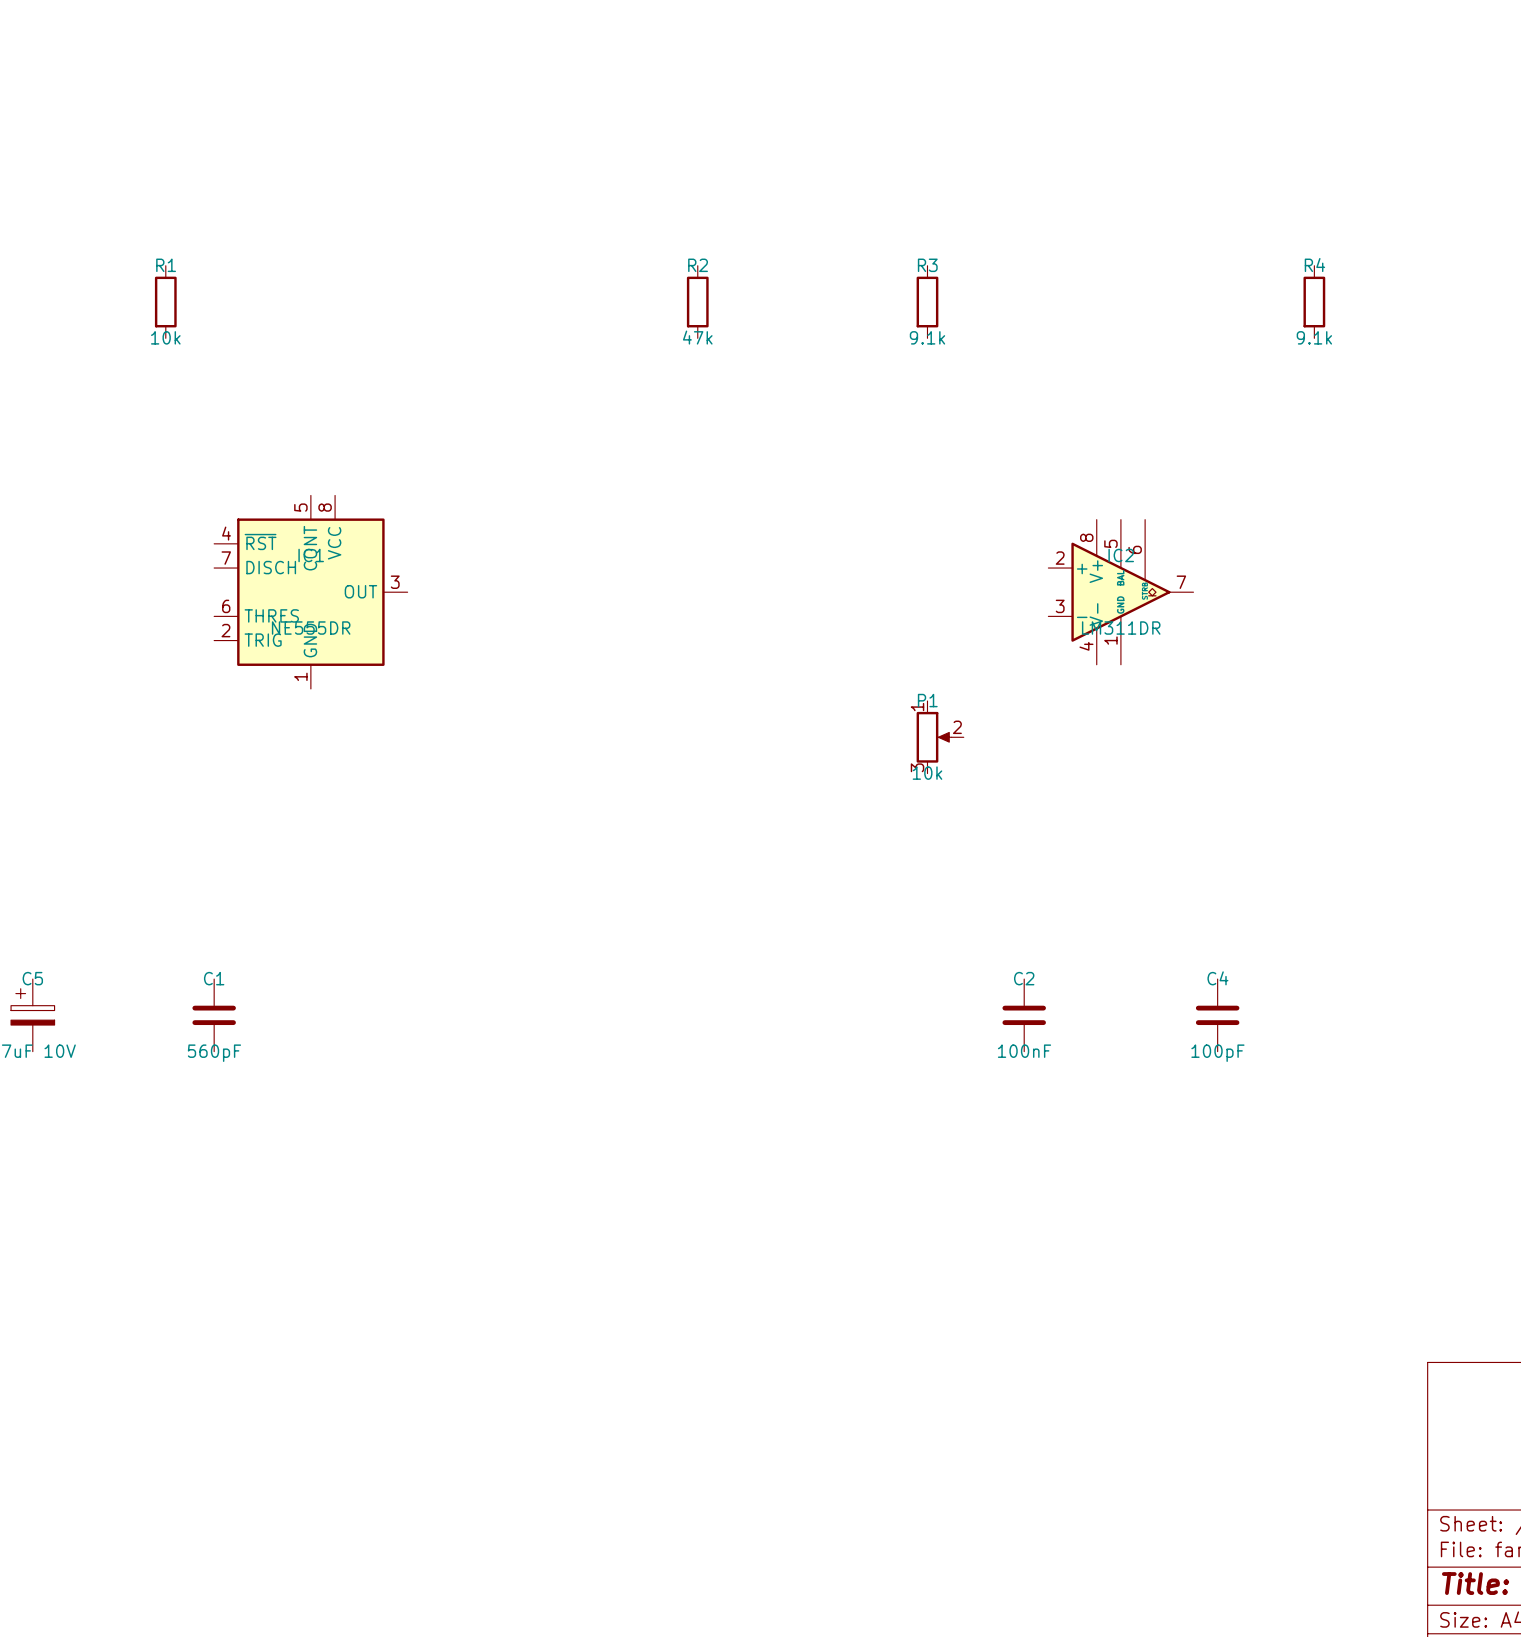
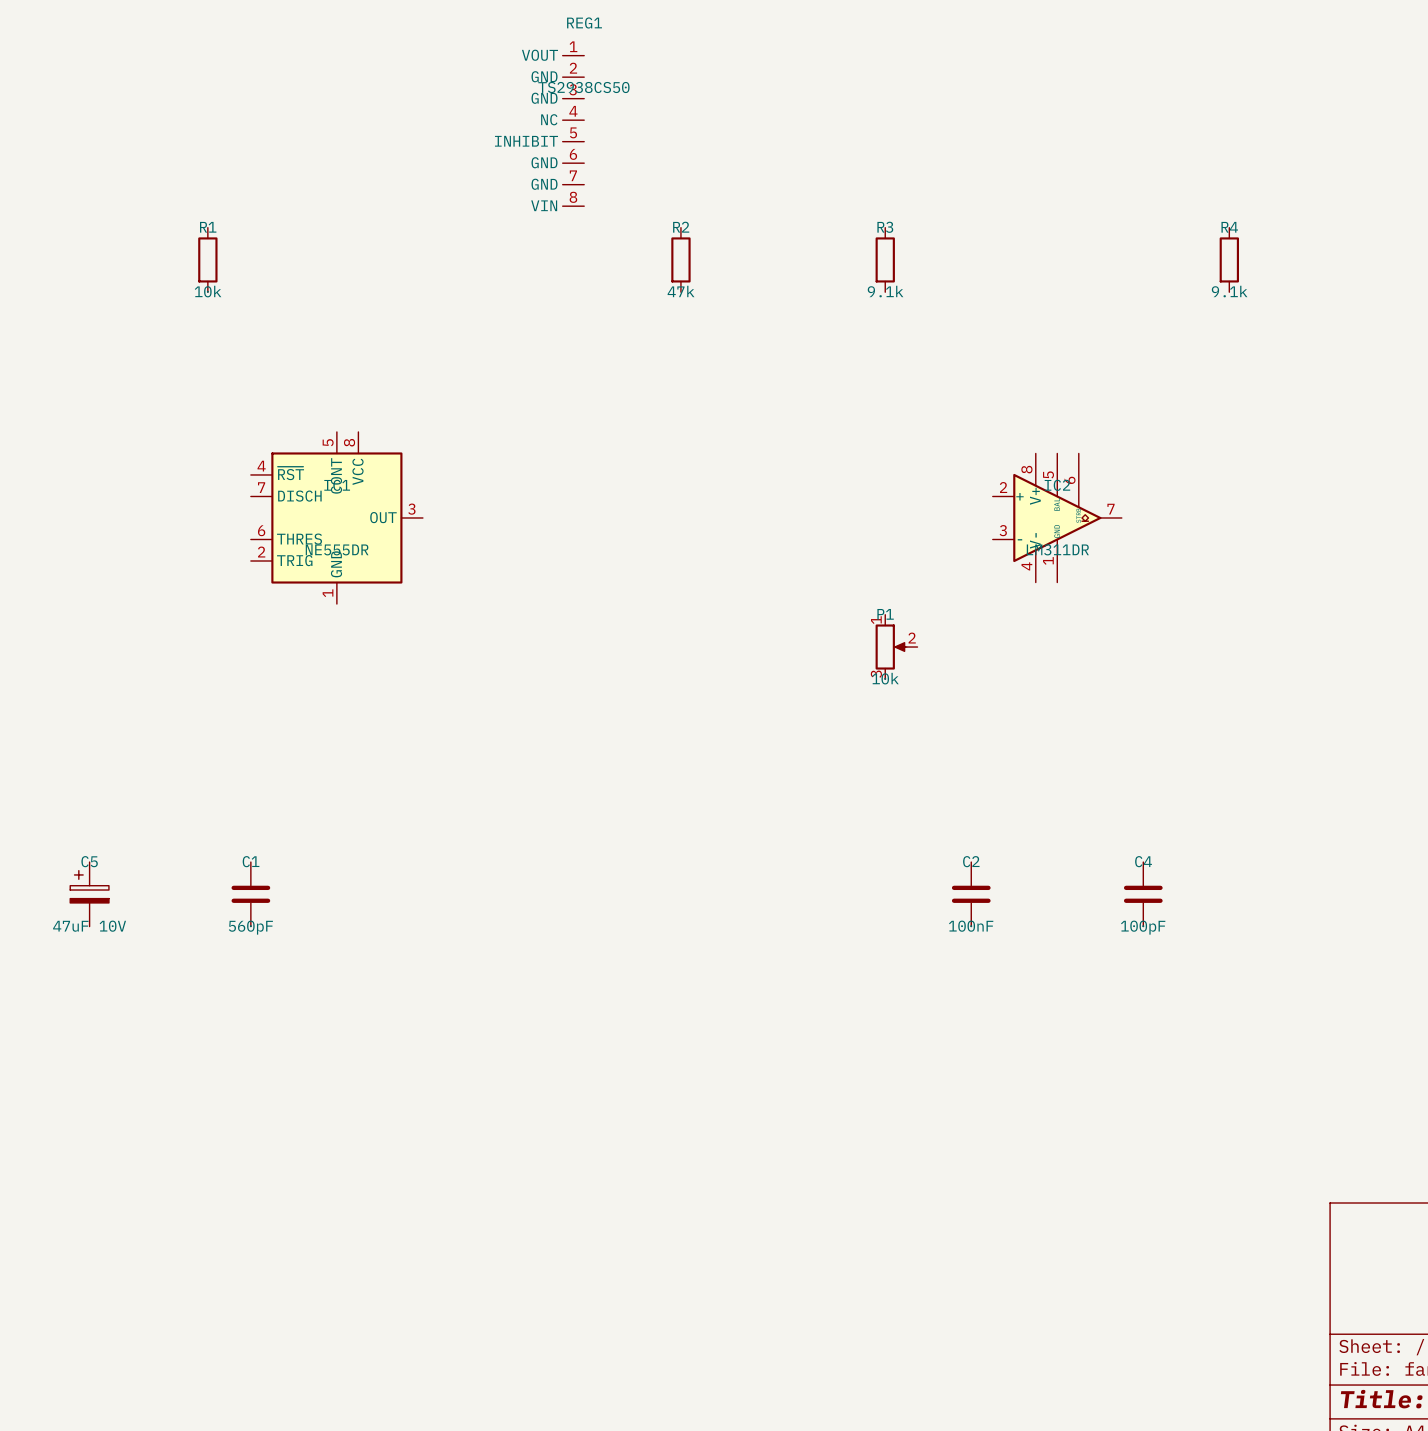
REG1: none -> TS2938CS50 (573, 130)

